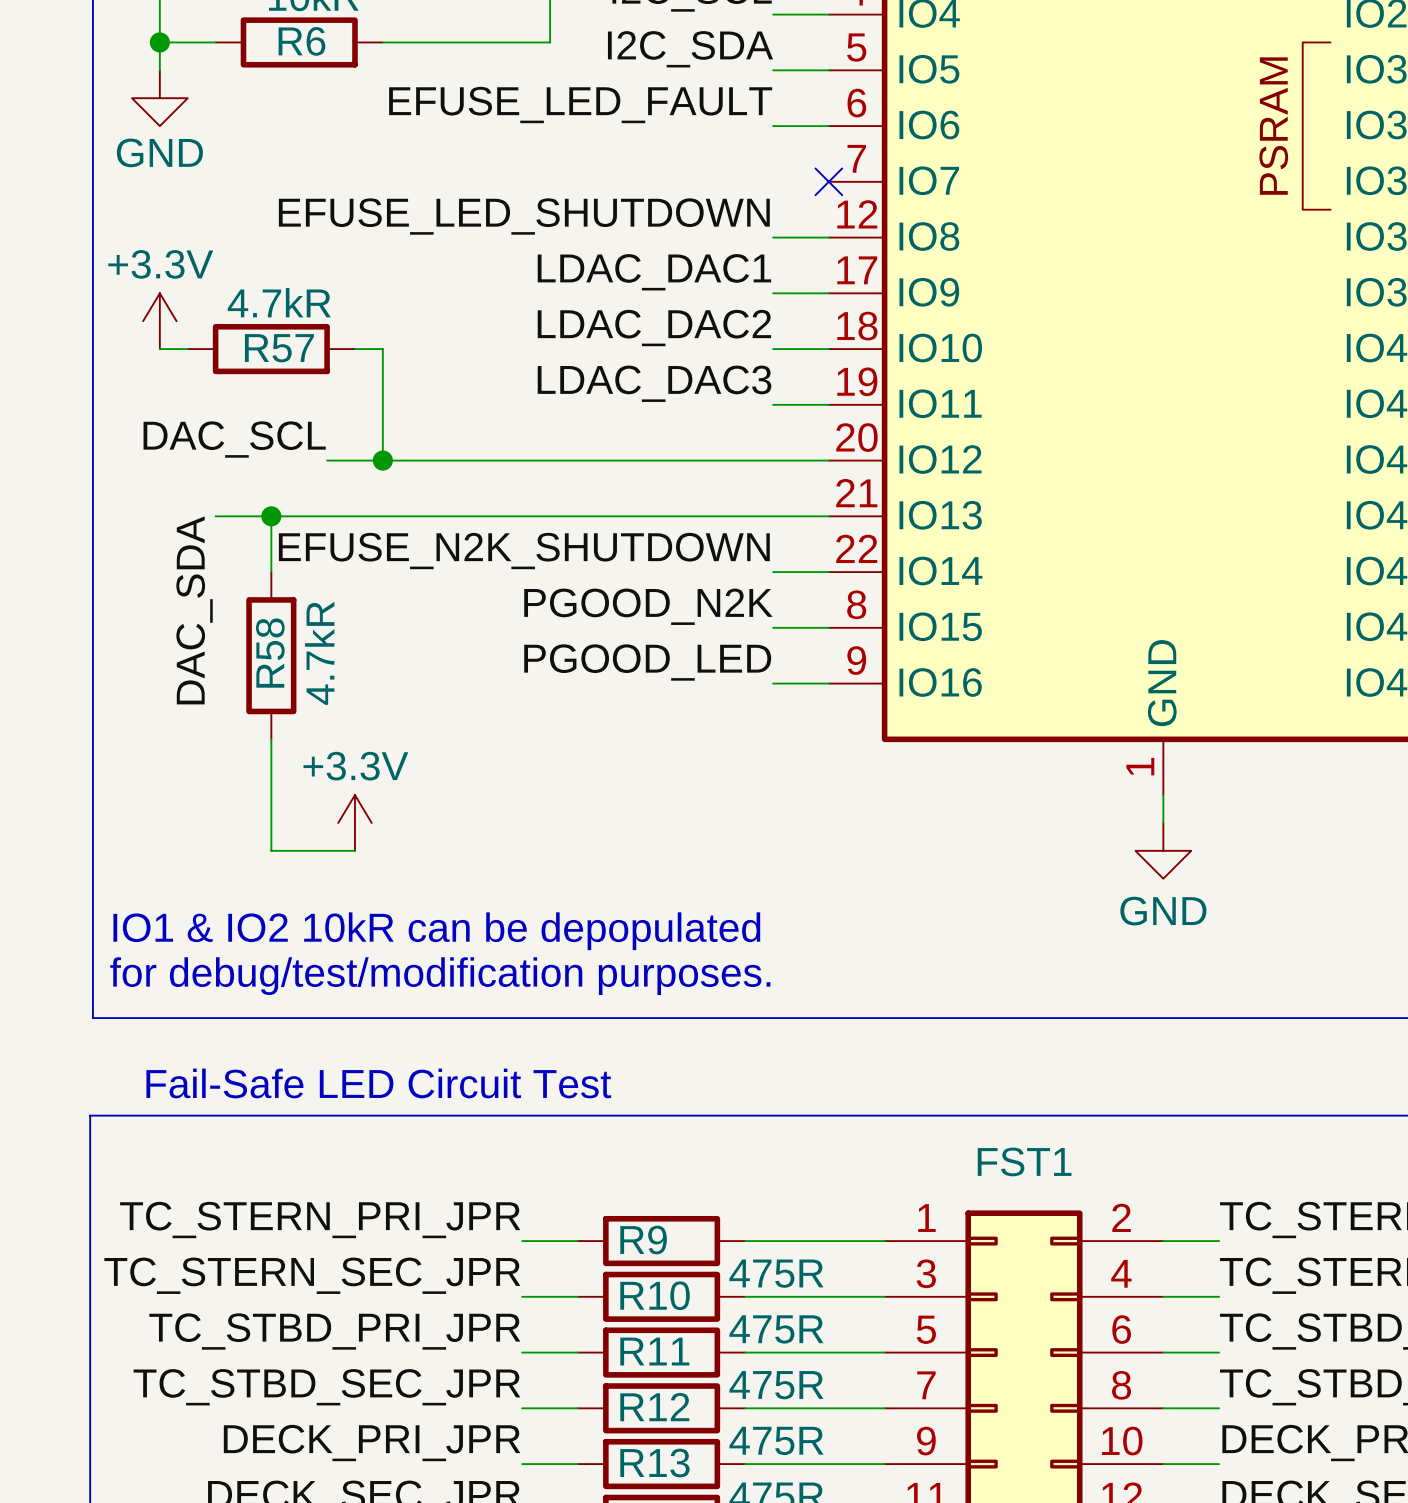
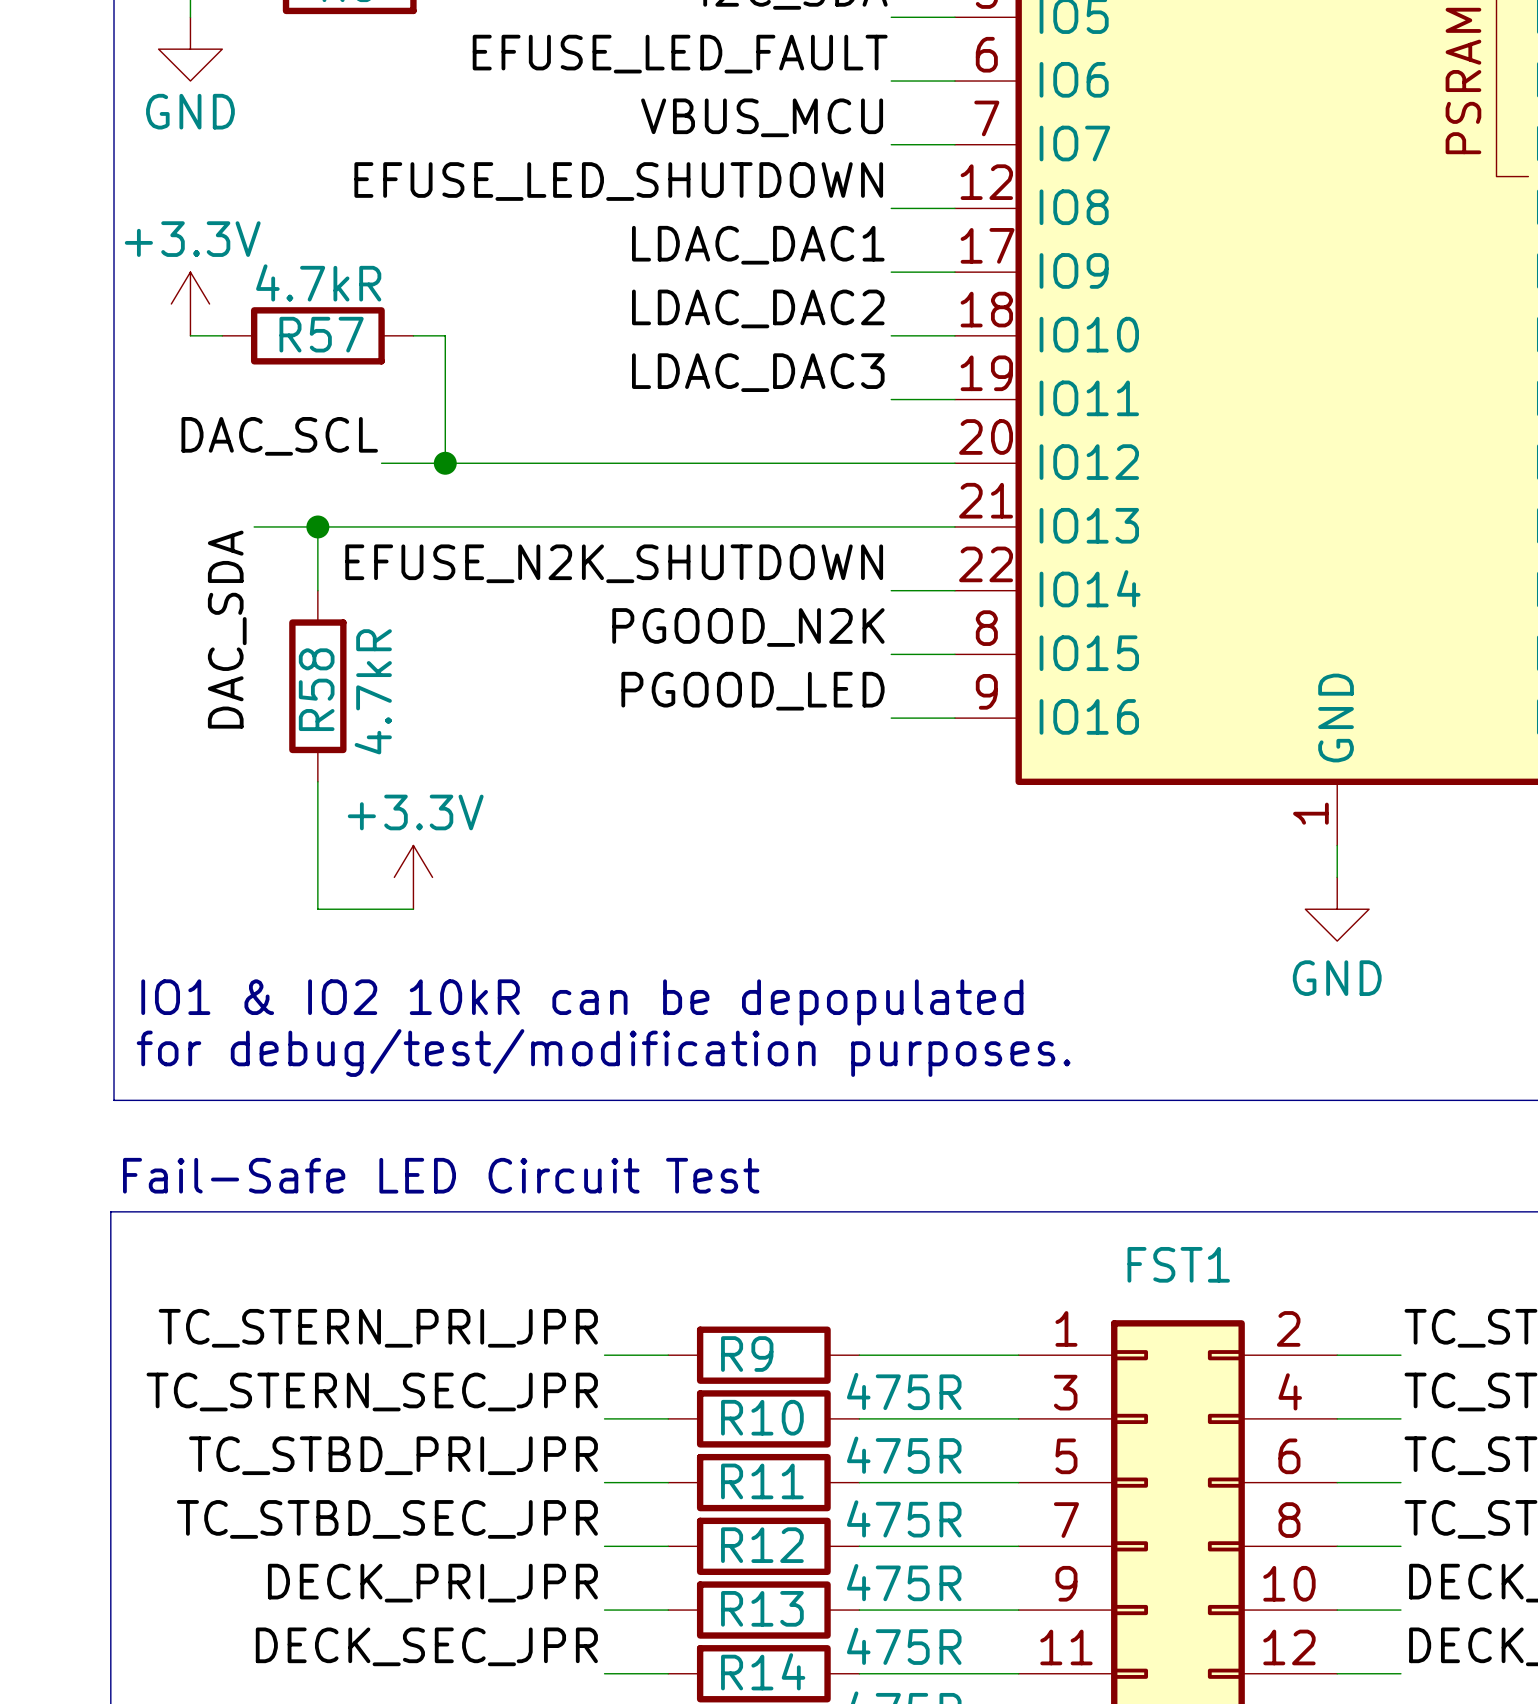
label: none -> VBUS_MCU (762, 117)
wire: none -> (891, 144) (954, 144)
no-connect mark: (828, 181) -> none

